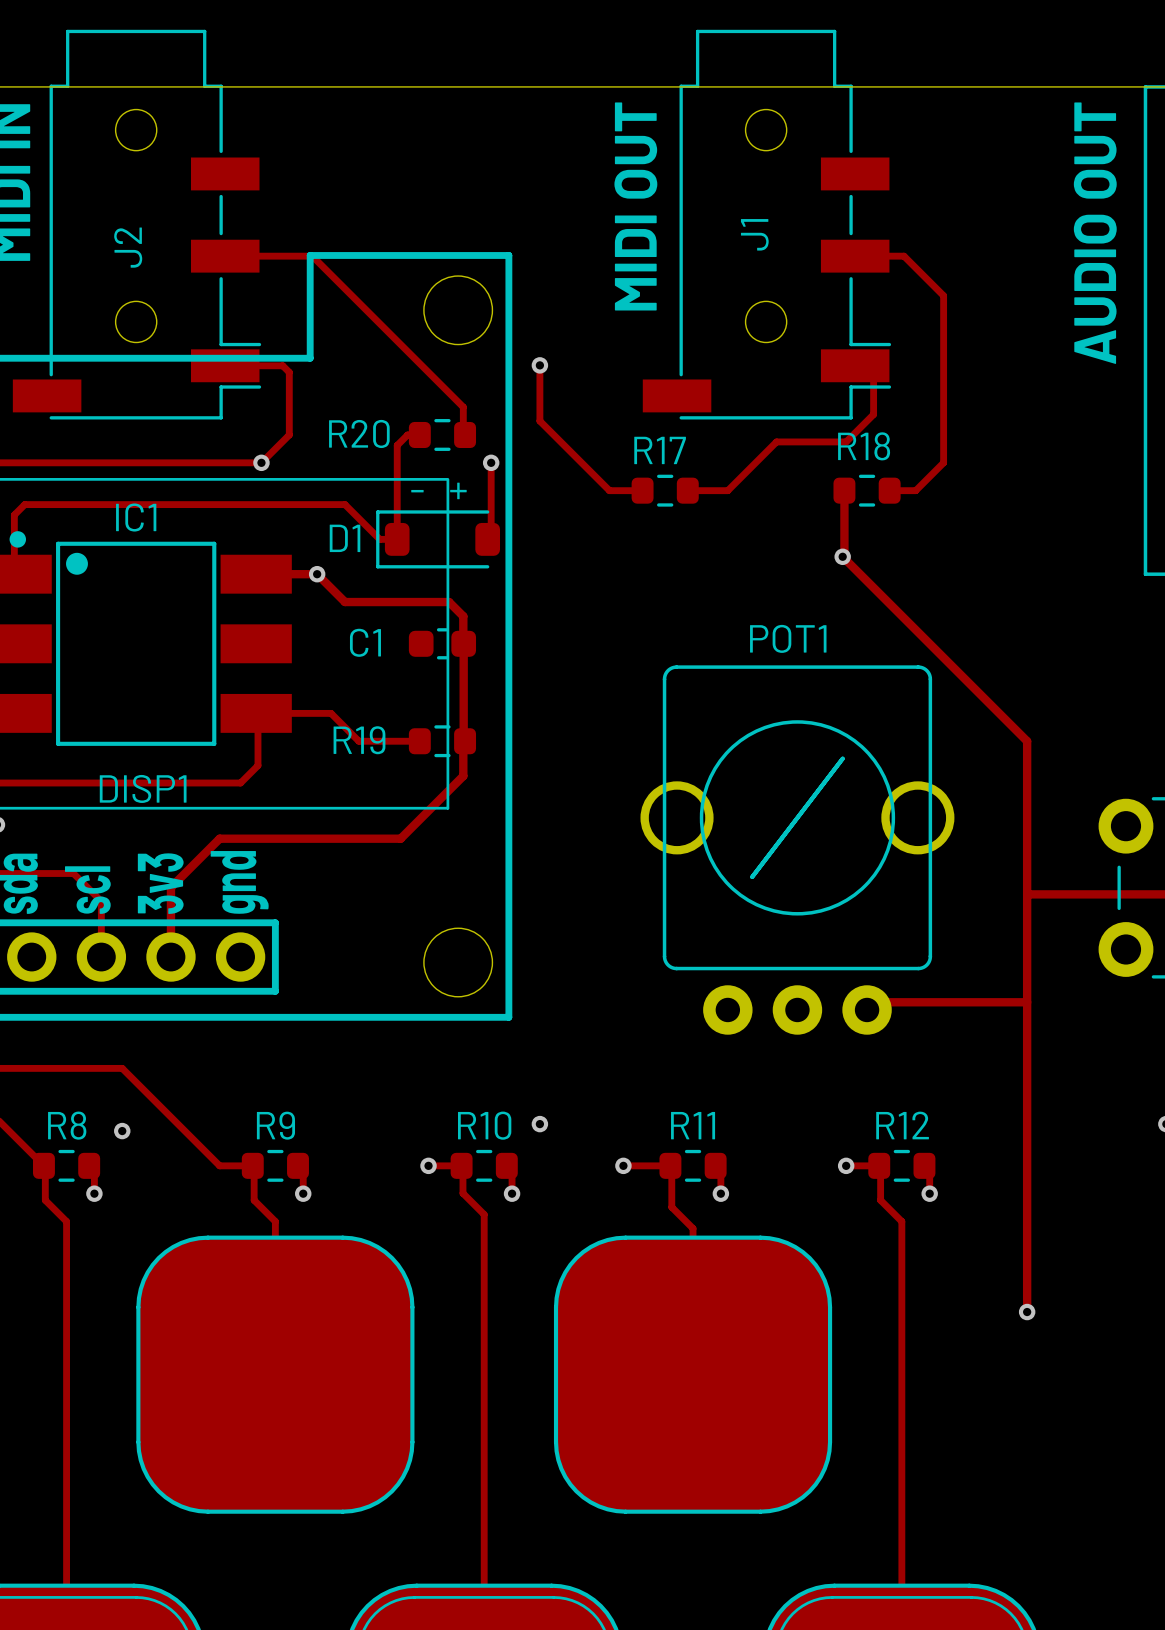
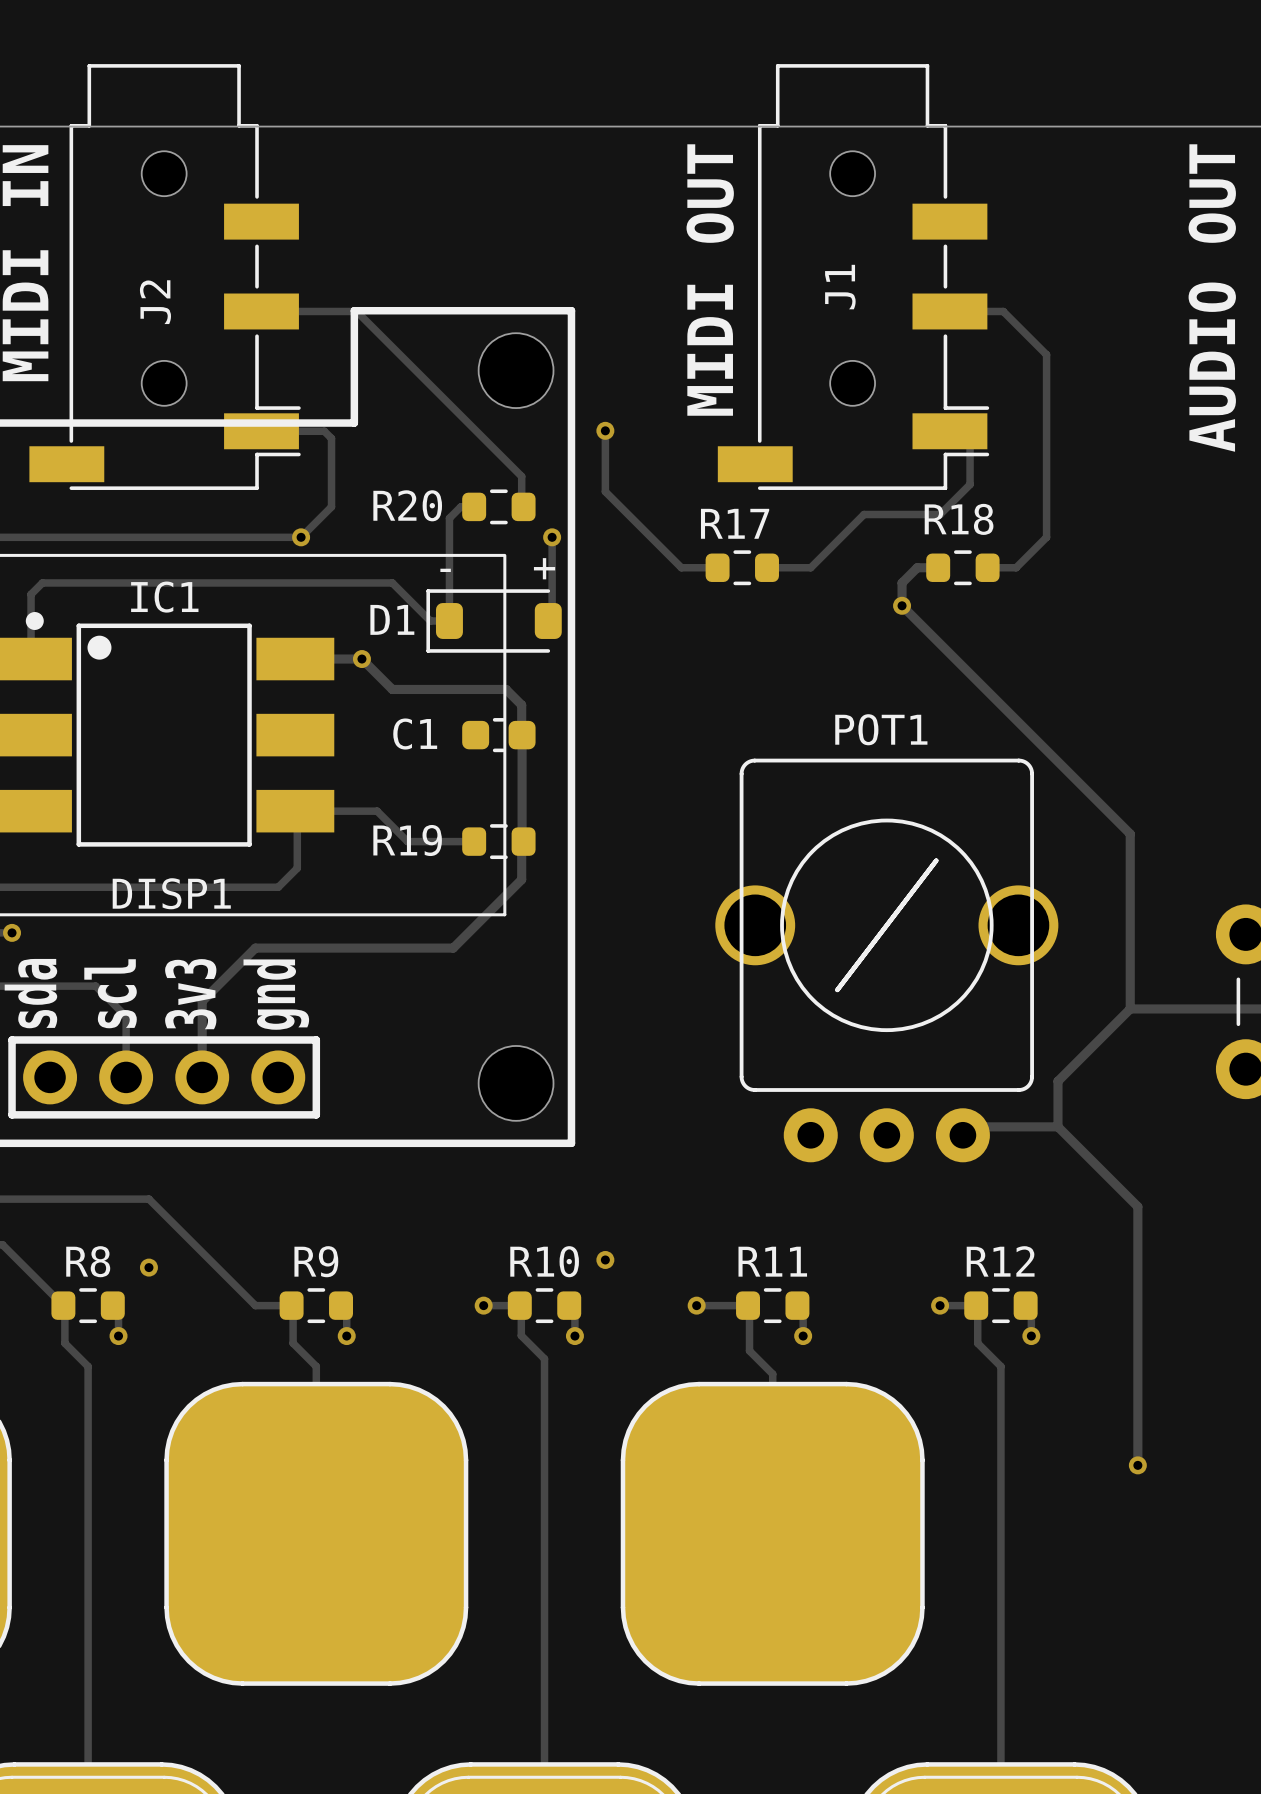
track: (844, 490) (844, 555) (842, 556) -> (938, 567) (917, 567) (902, 582) (902, 605) (936, 640)
via position: (842, 556) -> (902, 605)
track: (1020, 734) (1027, 741) (1027, 1075) -> (1130, 1008) (1057, 1081) (1057, 1126) (1137, 1206)
track: none -> (1130, 833) (1130, 1008)
track: (954, 1002) (1027, 1002) -> none

